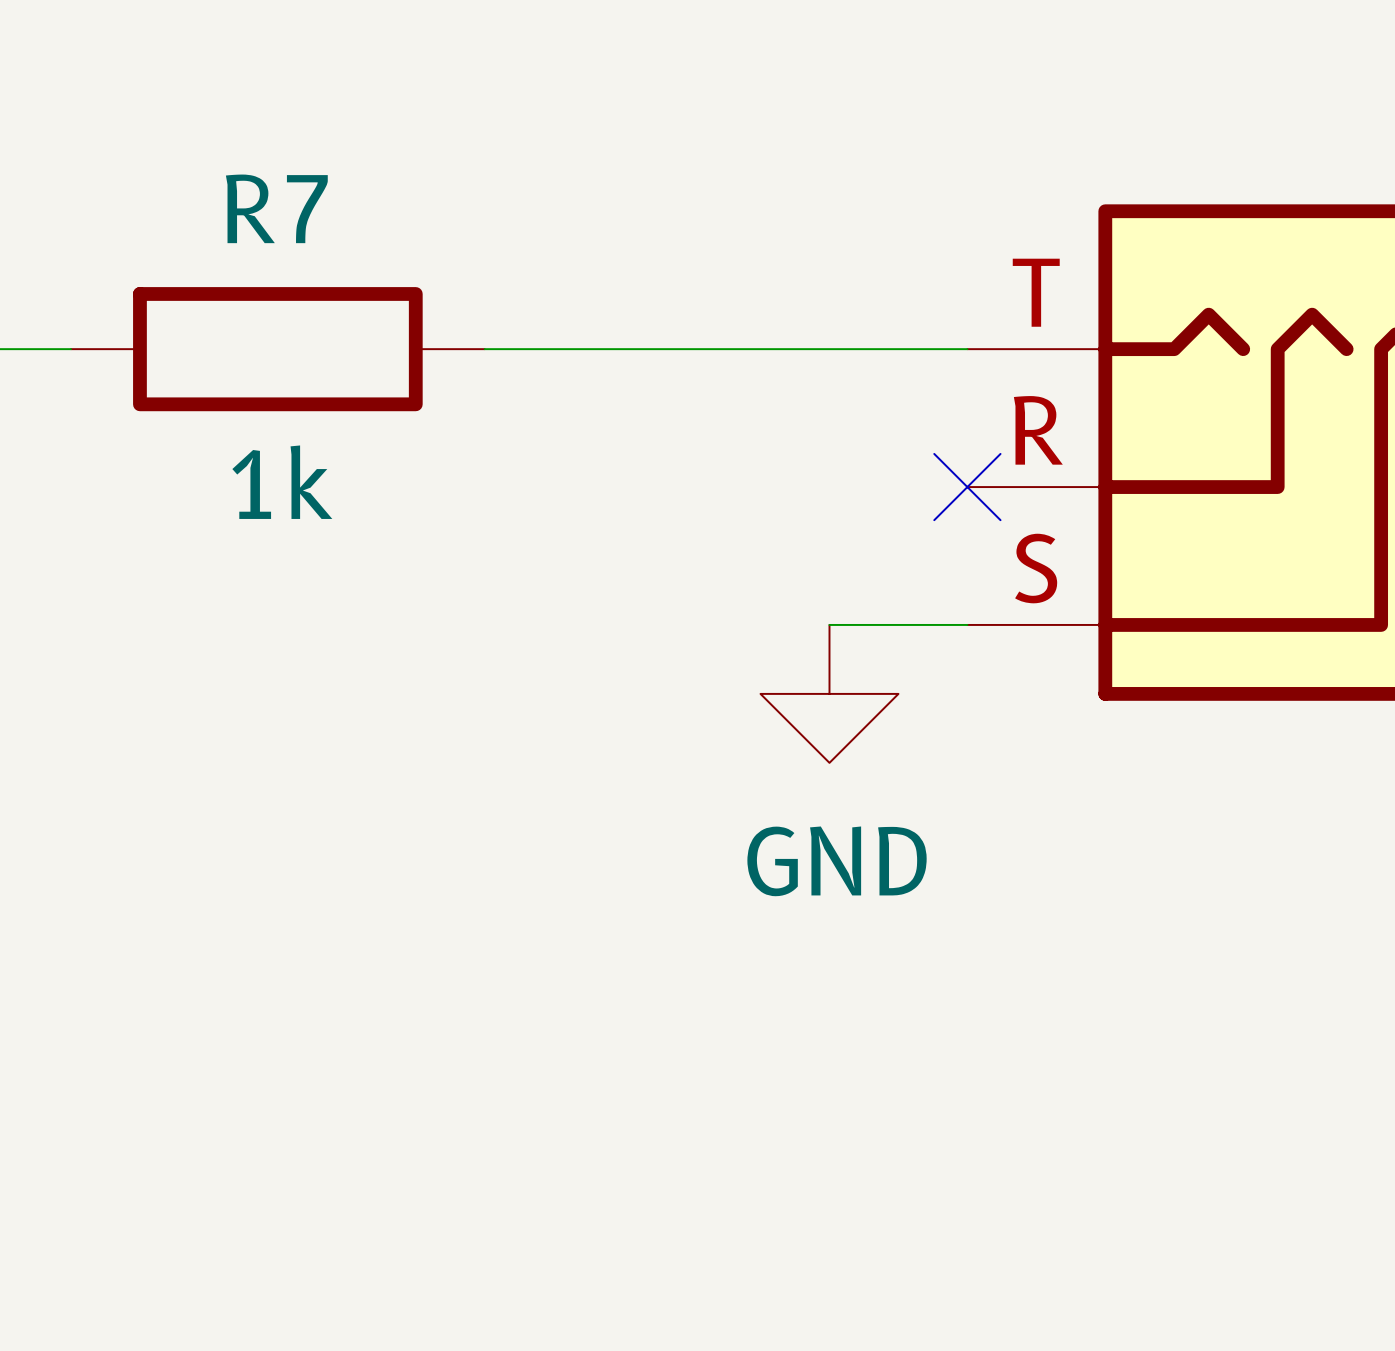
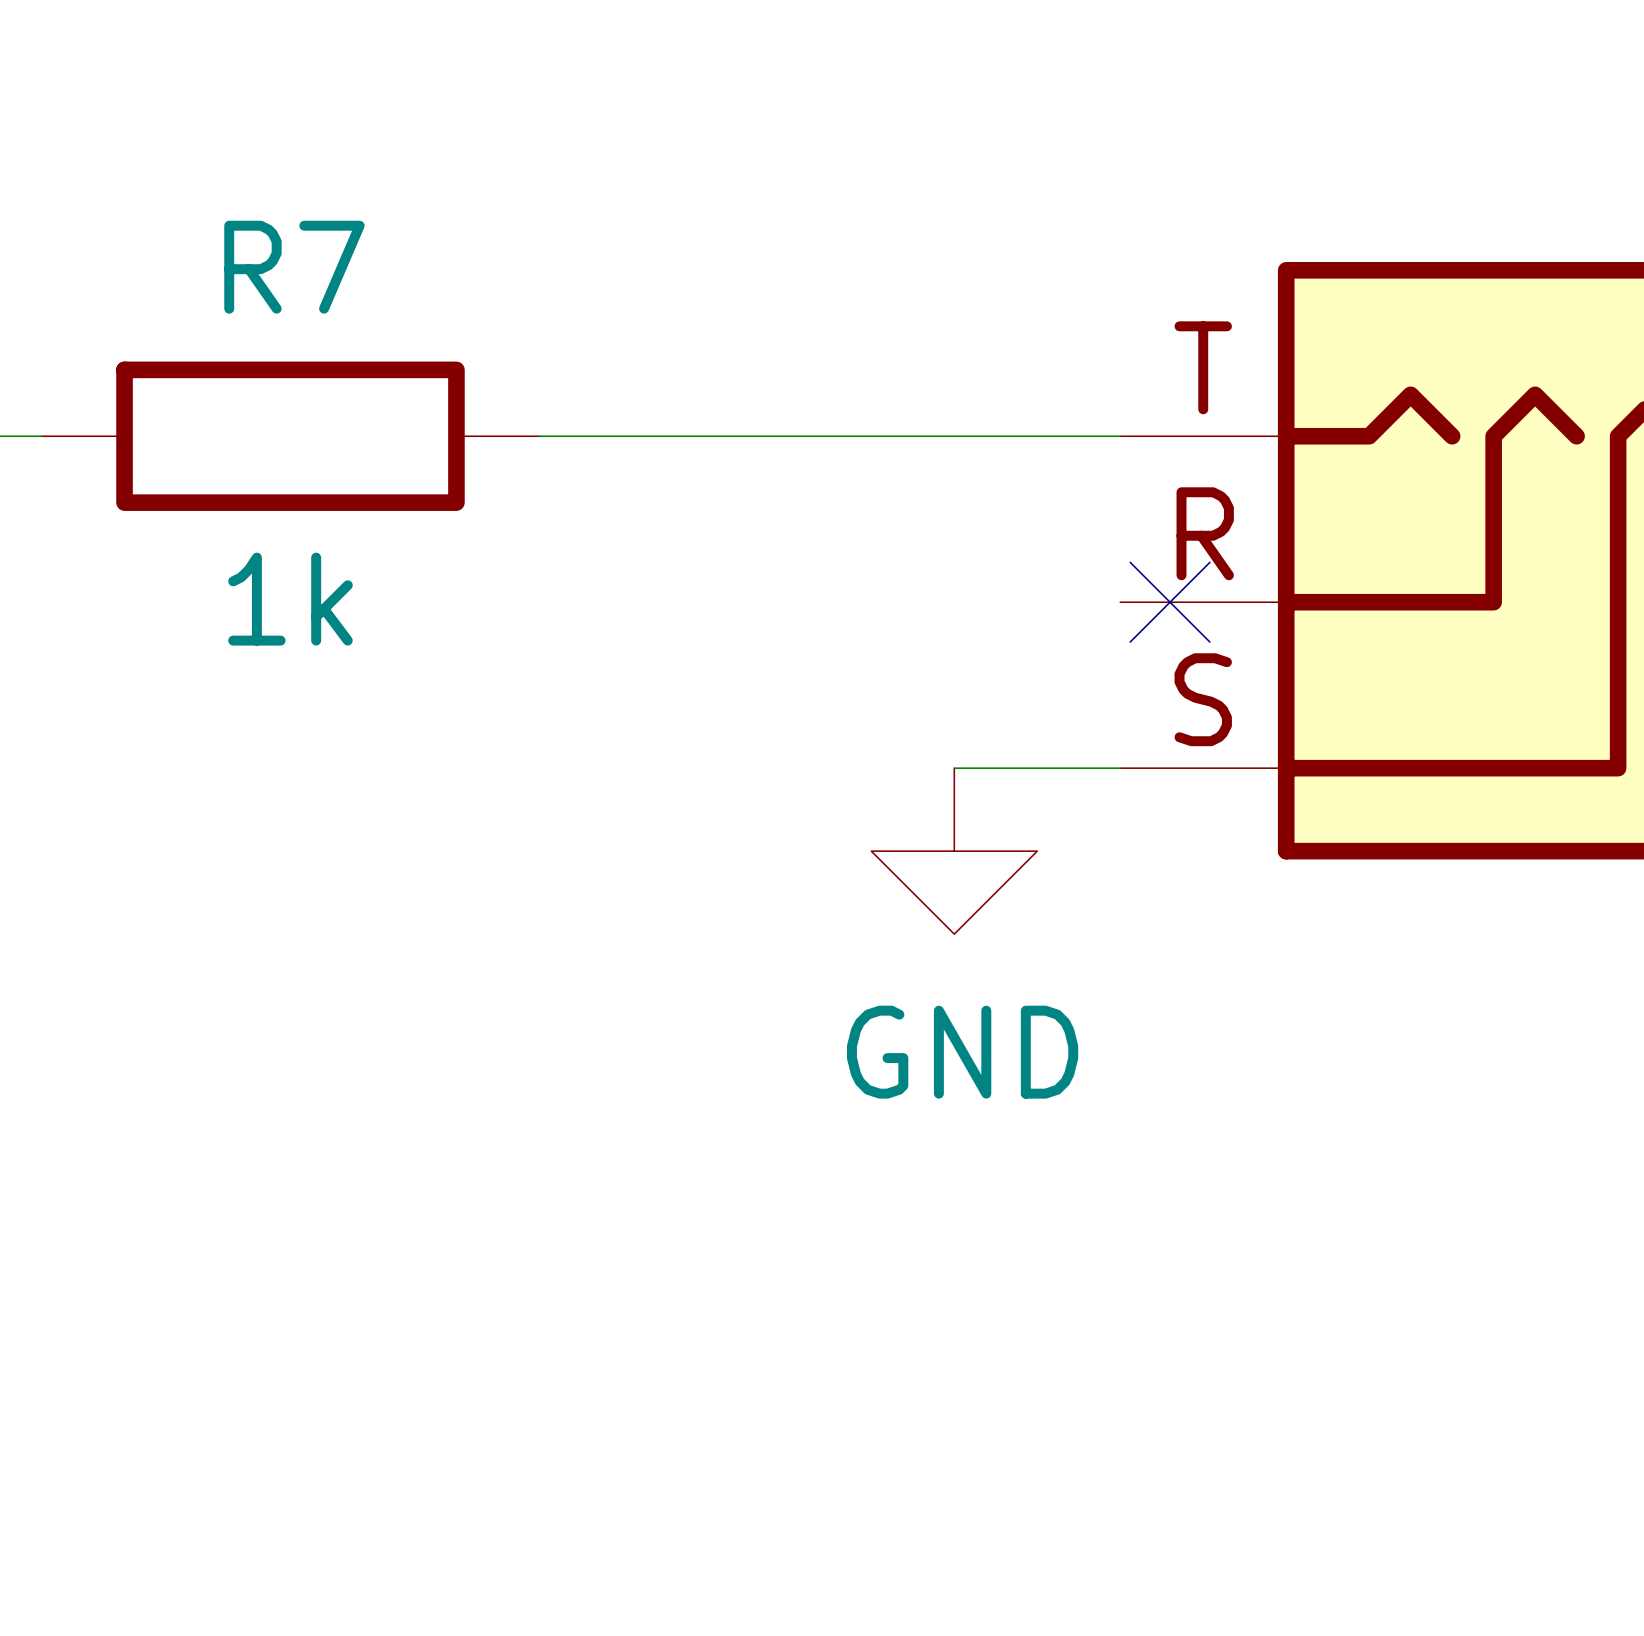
no-connect mark position: (967, 487) -> (1170, 602)

